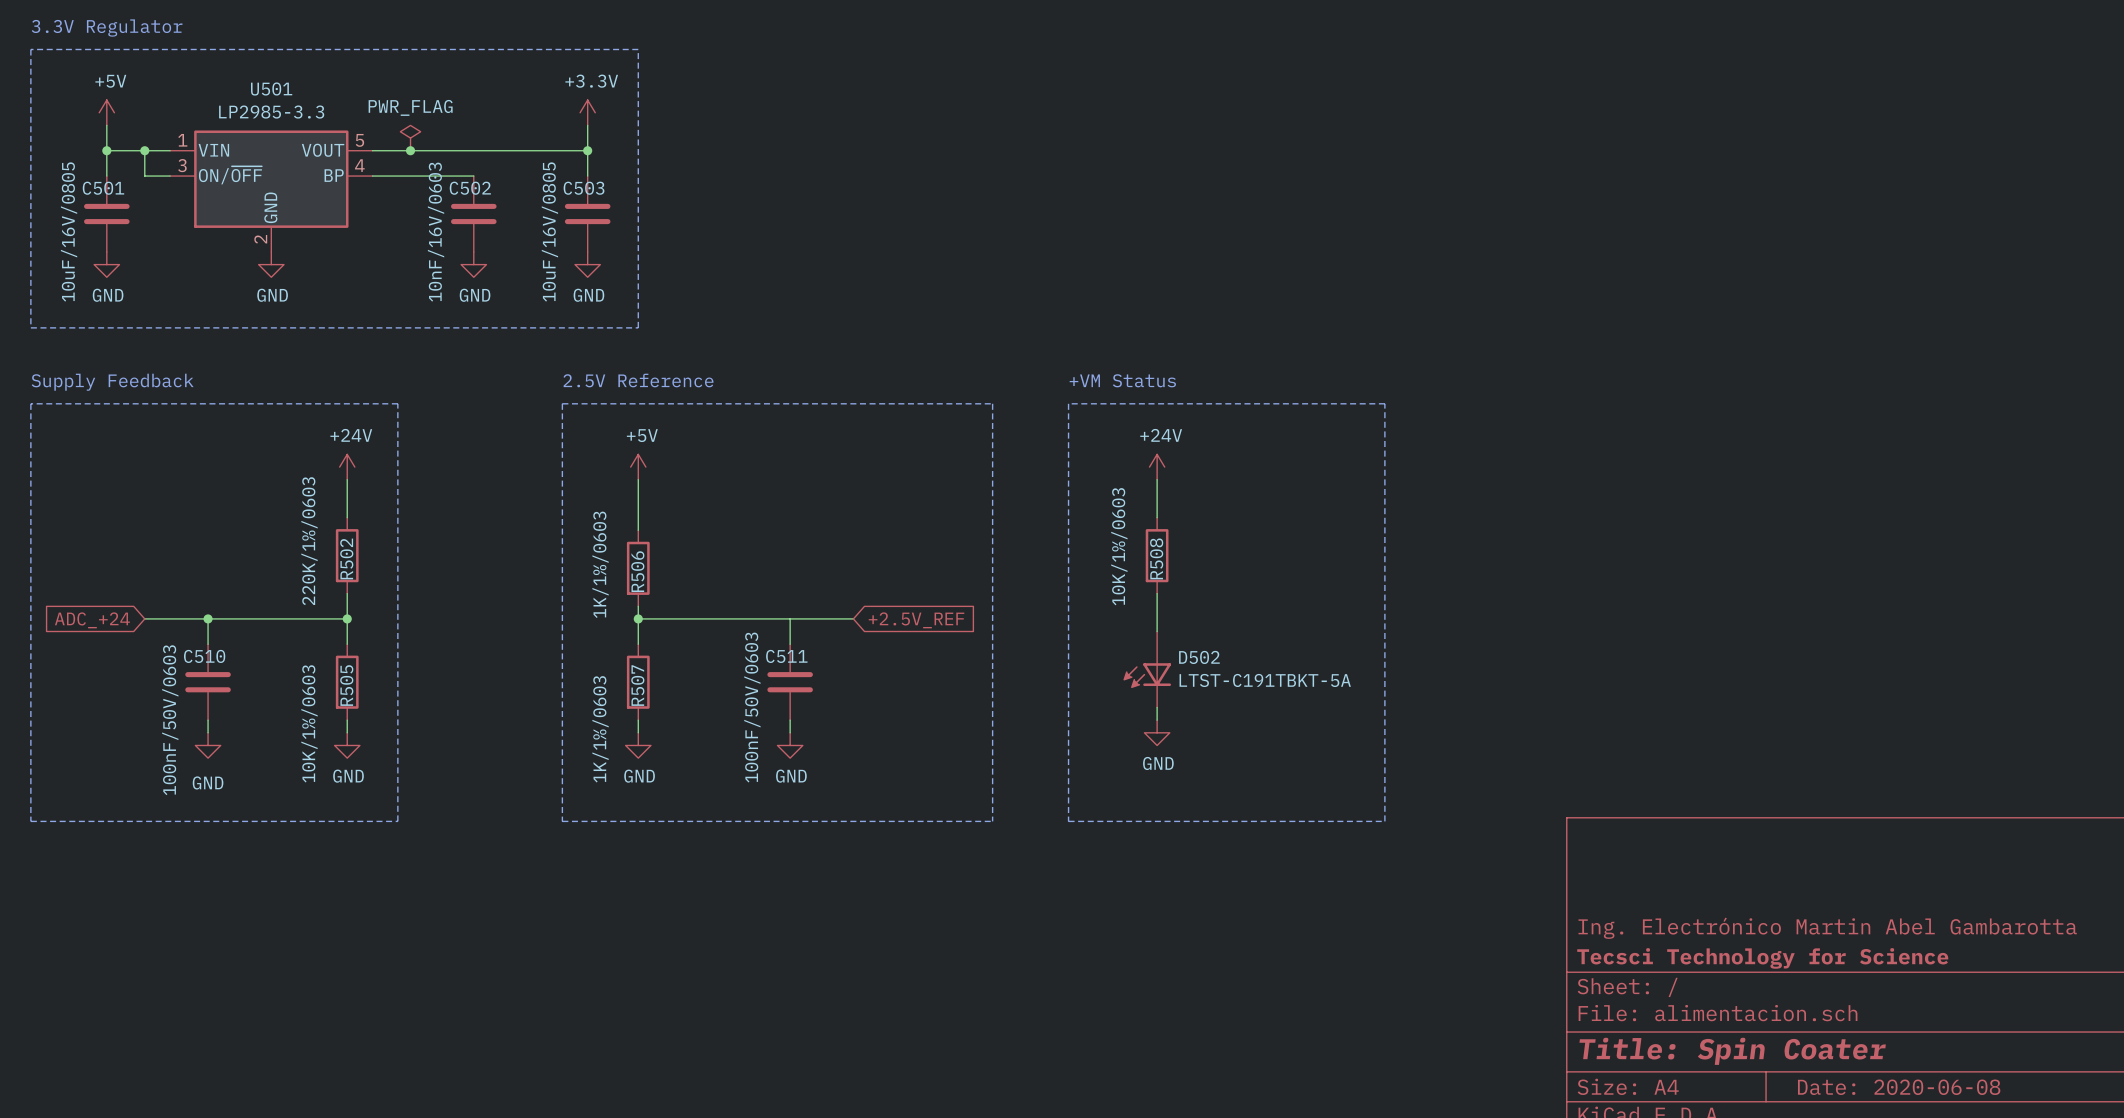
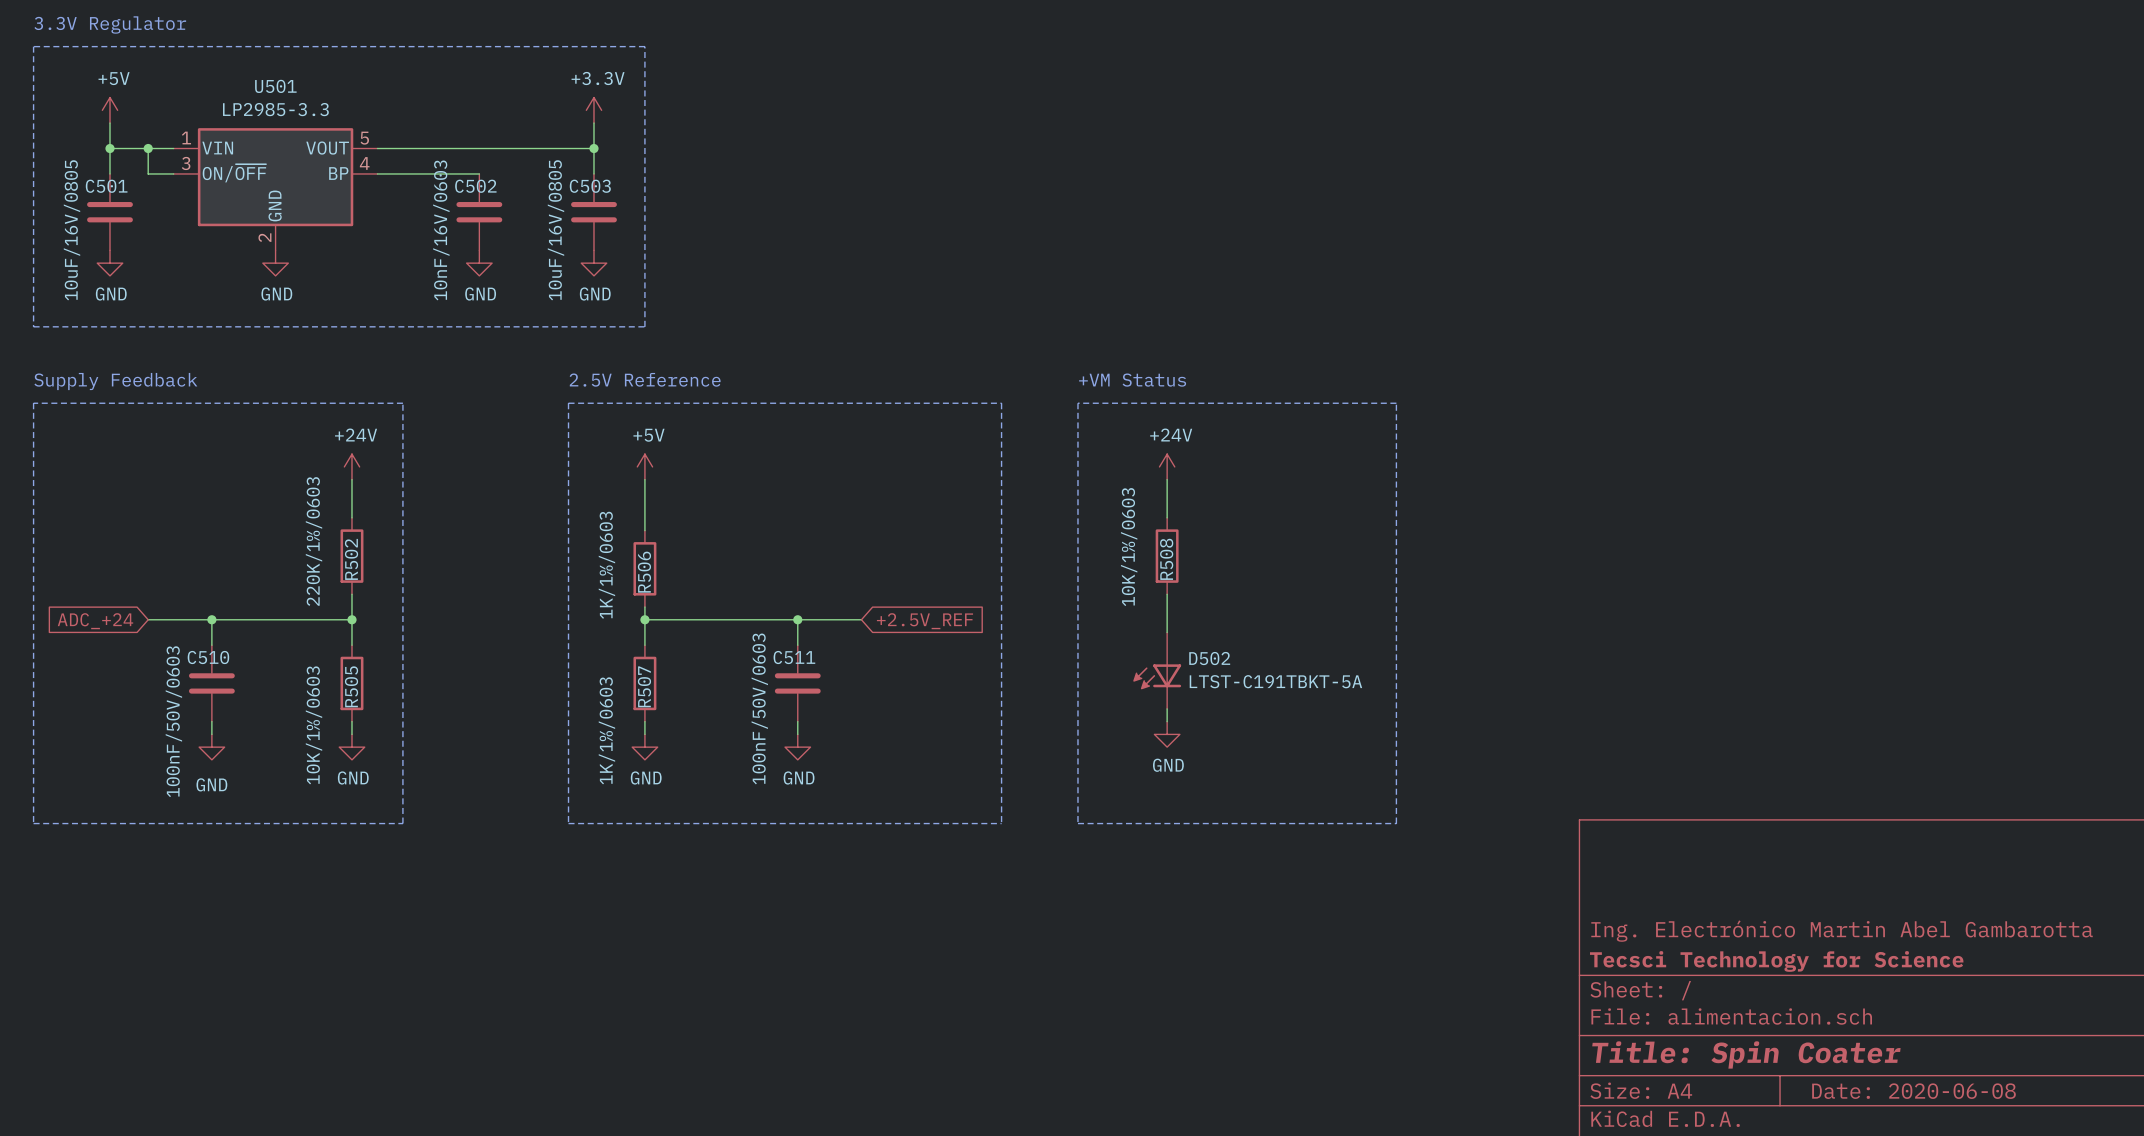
power symbol: PWR_FLAG (410, 138) -> none
junction: (410, 150) -> none
junction: none -> (797, 619)

